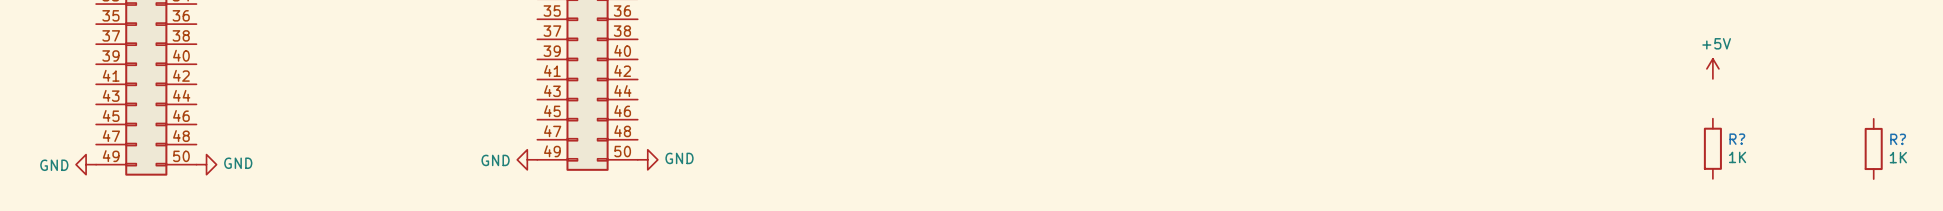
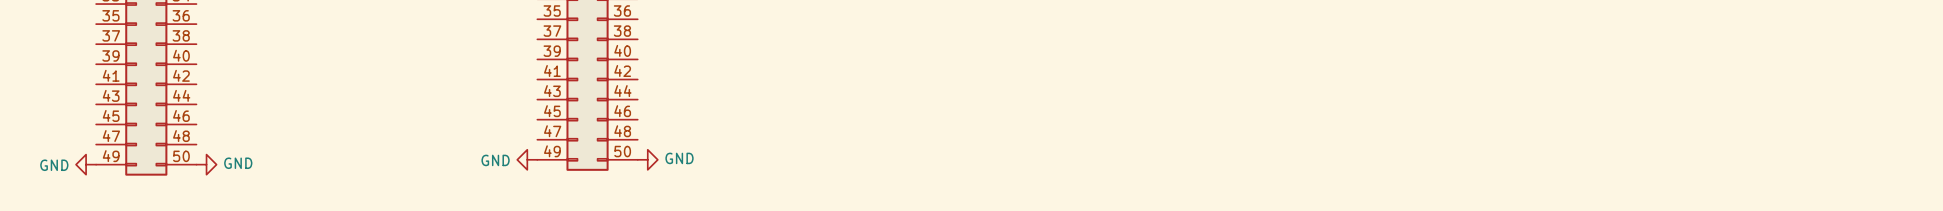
power symbol: +5V (1712, 68) -> none
R?: 1K (1712, 148) -> none
R?: 1K (1873, 148) -> none

